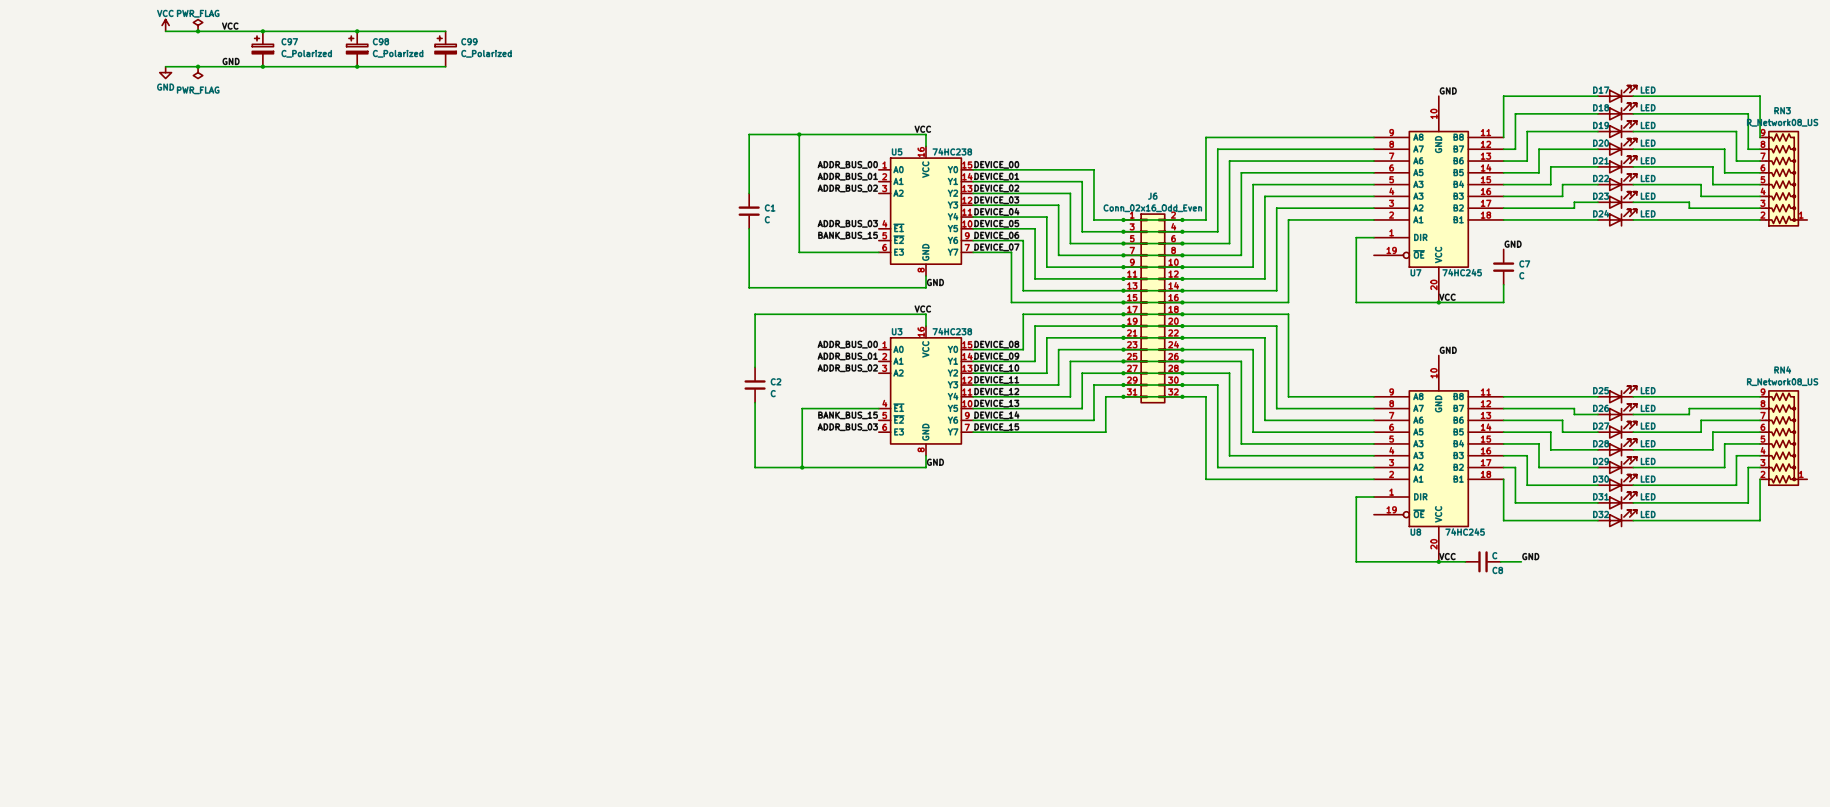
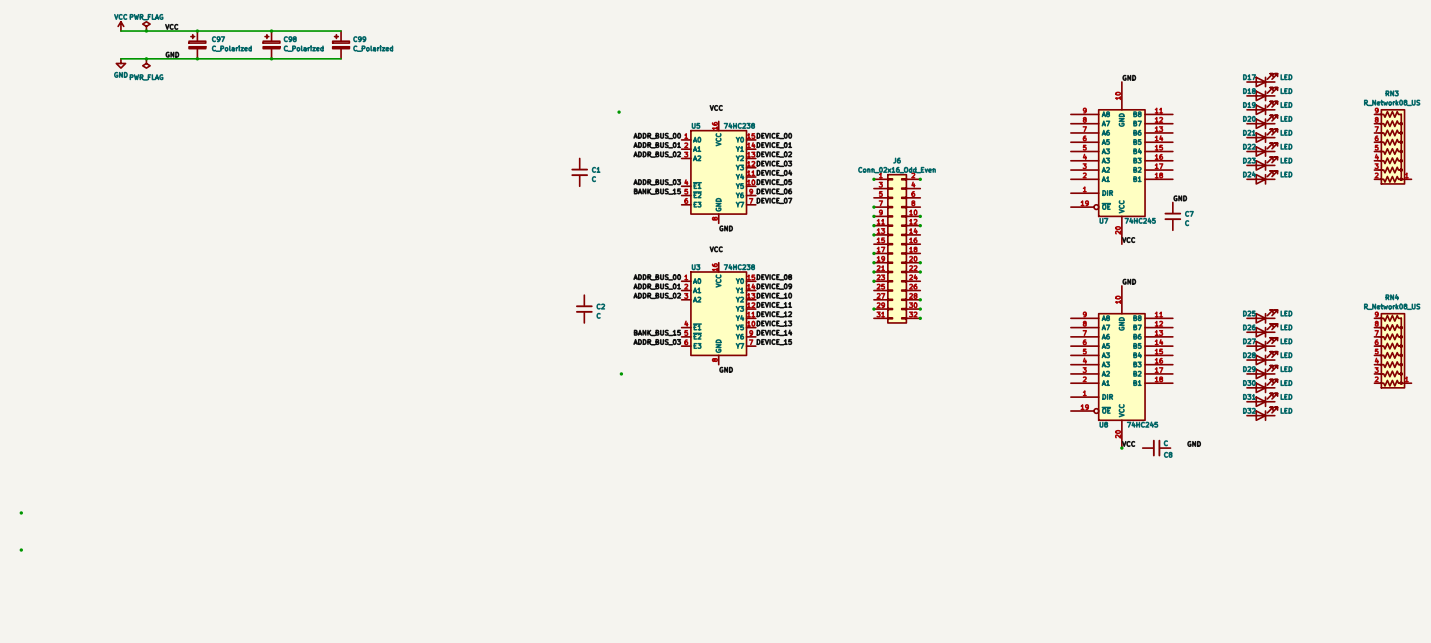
wire: (1597, 96) (1503, 96) (1503, 137) -> none
wire: (1633, 96) (1760, 96) (1760, 137) -> none
wire: (1597, 113) (1515, 113) (1515, 149) (1503, 149) -> none
wire: (1633, 113) (1748, 113) (1748, 149) (1760, 149) -> none
wire: (1597, 131) (1527, 131) (1527, 161) (1503, 161) -> none
wire: (1633, 131) (1736, 131) (1736, 161) (1760, 161) -> none
wire: (799, 134) (799, 252) (878, 252) -> none
wire: (1373, 137) (1205, 137) (1205, 219) (1093, 219) (1093, 169) (973, 169) -> none
wire: (926, 146) (926, 134) (749, 134) (749, 193) -> none
wire: (1373, 149) (1217, 149) (1217, 231) (1082, 231) (1082, 181) (973, 181) -> none
wire: (1597, 149) (1539, 149) (1539, 172) (1503, 172) -> none
wire: (1633, 149) (1724, 149) (1724, 172) (1760, 172) -> none
wire: (1373, 161) (1229, 161) (1229, 243) (1070, 243) (1070, 193) (973, 193) -> none
wire: (1597, 166) (1550, 166) (1550, 184) (1503, 184) -> none
wire: (1633, 166) (1712, 166) (1712, 184) (1760, 184) -> none
wire: (1373, 172) (1241, 172) (1241, 255) (1058, 255) (1058, 205) (973, 205) -> none
wire: (1373, 184) (1253, 184) (1253, 267) (1046, 267) (1046, 217) (973, 217) -> none
wire: (1597, 184) (1562, 184) (1562, 196) (1503, 196) -> none
wire: (1633, 184) (1701, 184) (1701, 196) (1760, 196) -> none
wire: (1373, 196) (1264, 196) (1264, 278) (1035, 278) (1035, 228) (973, 228) -> none
wire: (1597, 202) (1574, 202) (1574, 208) (1503, 208) -> none
wire: (1633, 202) (1689, 202) (1689, 208) (1760, 208) -> none
wire: (1373, 208) (1276, 208) (1276, 290) (1023, 290) (1023, 240) (973, 240) -> none
wire: (1373, 219) (1288, 219) (1288, 302) (1011, 302) (1011, 252) (973, 252) -> none
wire: (1503, 219) (1597, 219) -> none
wire: (1633, 219) (1760, 219) -> none
wire: (749, 228) (749, 287) (926, 287) (926, 275) -> none
junction: (1123, 231) -> none
junction: (1182, 231) -> none
wire: (1373, 237) (1356, 237) (1356, 302) (1503, 302) (1503, 284) -> none
junction: (1123, 243) -> none
junction: (1182, 243) -> none
junction: (1182, 255) -> none
junction: (1182, 290) -> none
junction: (1123, 302) -> none
junction: (1182, 302) -> none
junction: (1438, 302) -> none
junction: (1182, 314) -> none
wire: (926, 326) (926, 314) (755, 314) (755, 367) -> none
wire: (973, 349) (1023, 349) (1023, 314) (1288, 314) (1288, 396) (1373, 396) -> none
junction: (1182, 349) -> none
wire: (973, 361) (1035, 361) (1035, 326) (1276, 326) (1276, 408) (1373, 408) -> none
junction: (1123, 361) -> none
junction: (1182, 361) -> none
wire: (973, 373) (1046, 373) (1046, 337) (1264, 337) (1264, 420) (1373, 420) -> none
junction: (1123, 373) -> none
wire: (973, 385) (1058, 385) (1058, 349) (1253, 349) (1253, 432) (1373, 432) -> none
wire: (973, 396) (1070, 396) (1070, 361) (1241, 361) (1241, 443) (1373, 443) -> none
junction: (1123, 396) -> none
wire: (1503, 396) (1597, 396) -> none
wire: (1633, 396) (1760, 396) -> none
wire: (755, 402) (755, 467) (926, 467) (926, 455) -> none
wire: (878, 408) (802, 408) (802, 467) -> none
wire: (973, 408) (1082, 408) (1082, 373) (1229, 373) (1229, 455) (1373, 455) -> none
wire: (1503, 408) (1574, 408) (1574, 414) (1597, 414) -> none
wire: (1760, 408) (1689, 408) (1689, 414) (1633, 414) -> none
wire: (973, 420) (1093, 420) (1093, 385) (1217, 385) (1217, 467) (1373, 467) -> none
wire: (1503, 420) (1562, 420) (1562, 432) (1597, 432) -> none
wire: (1760, 420) (1701, 420) (1701, 432) (1633, 432) -> none
wire: (973, 432) (1105, 432) (1105, 396) (1205, 396) (1205, 479) (1373, 479) -> none
wire: (1503, 432) (1550, 432) (1550, 449) (1597, 449) -> none
wire: (1760, 432) (1712, 432) (1712, 449) (1633, 449) -> none
wire: (1503, 443) (1539, 443) (1539, 467) (1597, 467) -> none
wire: (1760, 443) (1724, 443) (1724, 467) (1633, 467) -> none
wire: (1503, 455) (1527, 455) (1527, 485) (1597, 485) -> none
wire: (1760, 455) (1736, 455) (1736, 485) (1633, 485) -> none
wire: (1503, 467) (1515, 467) (1515, 502) (1597, 502) -> none
wire: (1760, 467) (1748, 467) (1748, 502) (1633, 502) -> none
wire: (1503, 479) (1503, 520) (1597, 520) -> none
wire: (1760, 479) (1760, 520) (1633, 520) -> none
wire: (1373, 497) (1356, 497) (1356, 561) (1465, 561) -> none
wire: (1500, 561) (1521, 561) -> none
junction: none -> (21, 512)
junction: none -> (21, 550)

